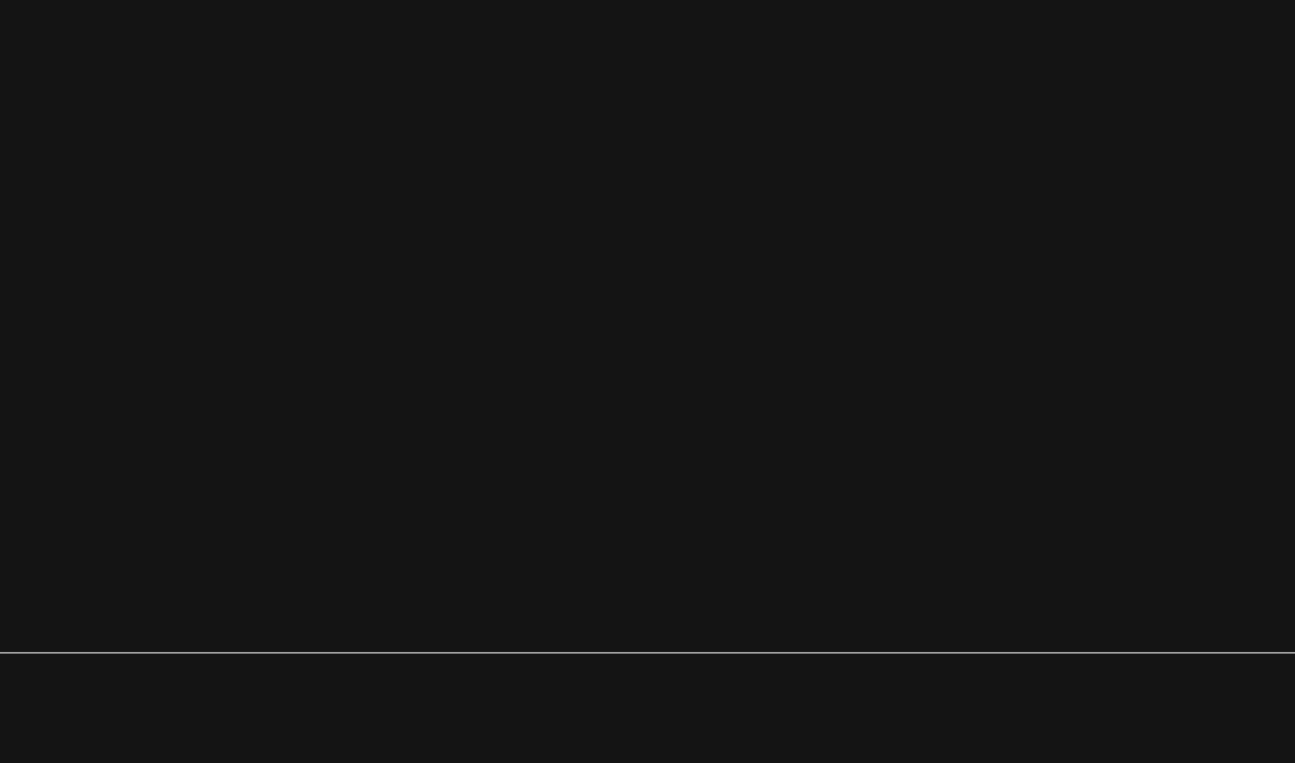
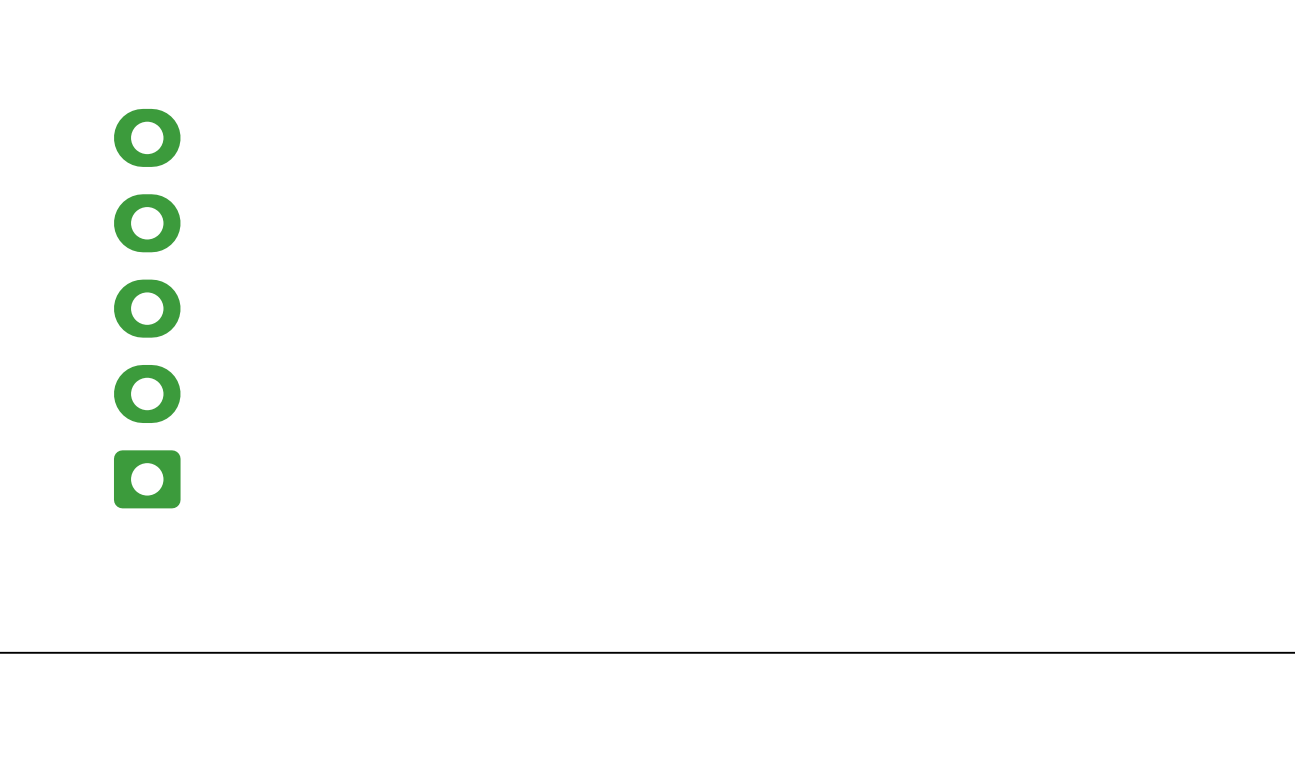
part: none -> (147, 308)

